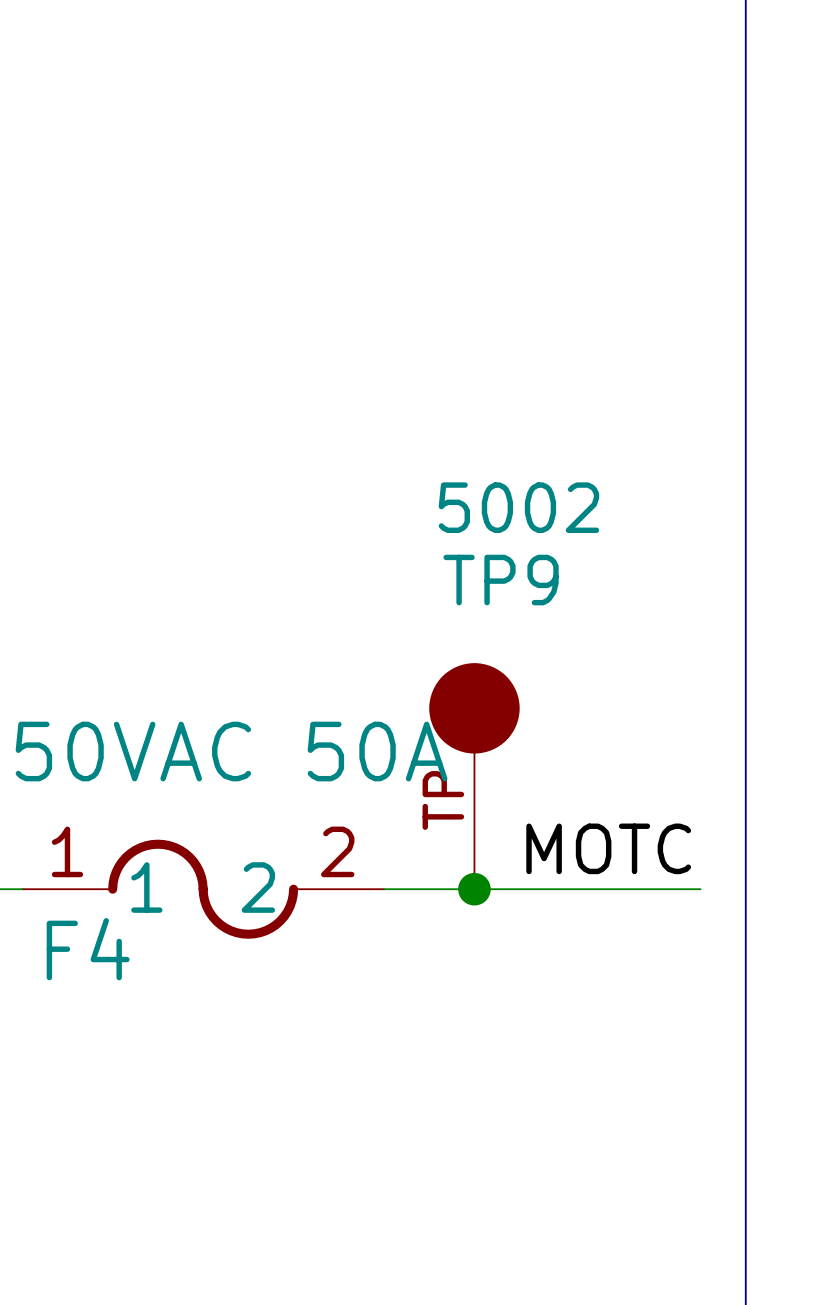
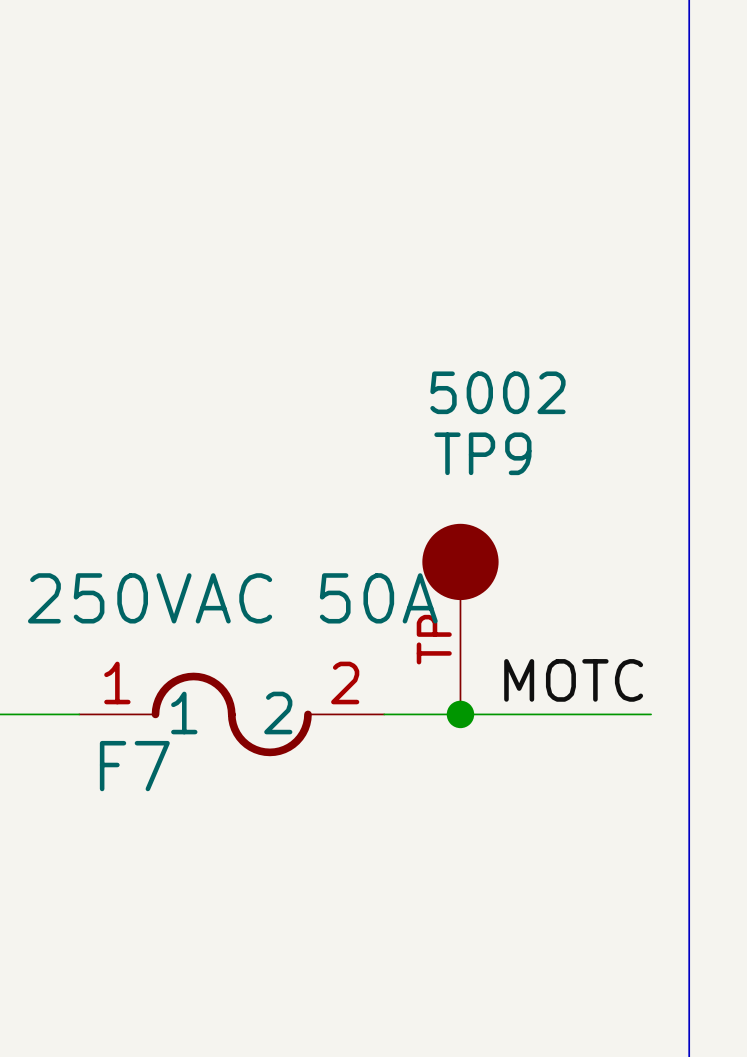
F4 name: F4 (88, 949) -> F7 (134, 766)

